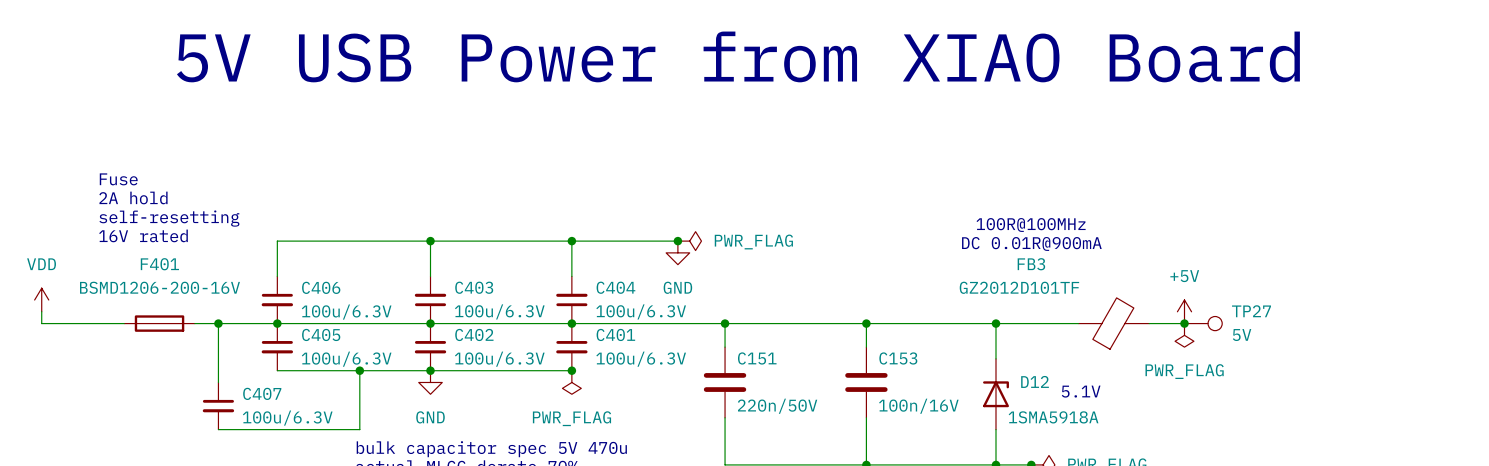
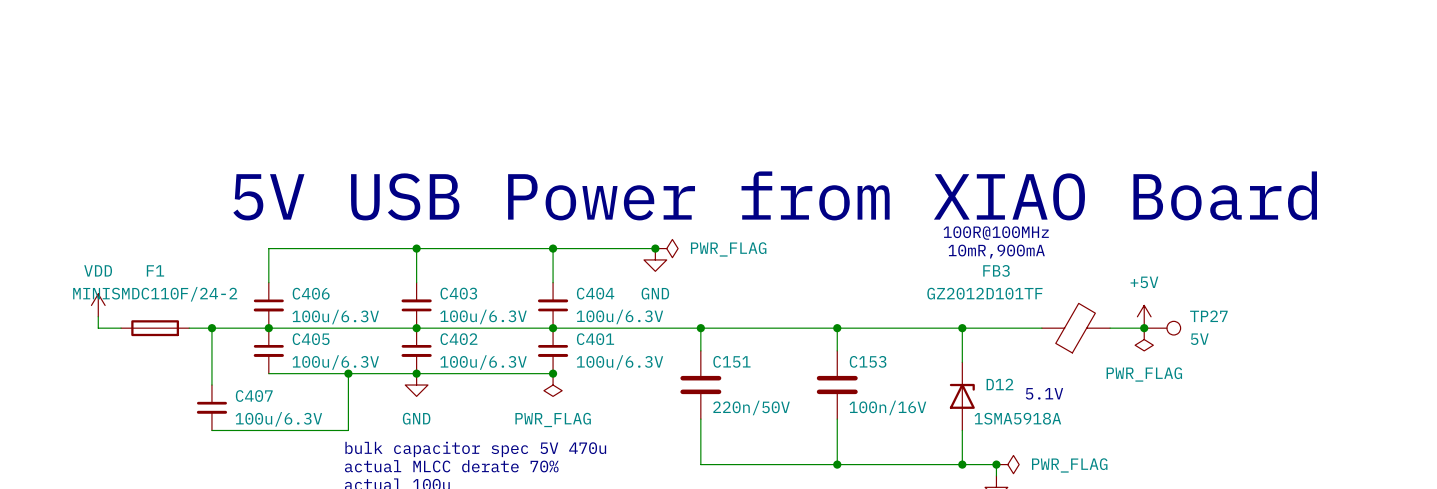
text position: 5V USB Power from XIAO Board (738, 56) -> 5V USB Power from XIAO Board (775, 195)
text: Fuse (118, 179) -> none
text: 2A hold (133, 197) -> none
text: self-resetting (169, 218) -> none
text: 16V rated (143, 235) -> none
text: DC 0.01R@900mA (1031, 243) -> 10mR,900mA (996, 251)
F401 name: F401 (159, 264) -> F1 (155, 270)
F401 value: BSMD1206-200-16V (159, 287) -> MINISMDC110F/24-2 (155, 294)
power symbol position: VDD (41, 300) -> VDD (98, 305)
wire: (41, 311) (41, 323) (100, 323) -> (98, 316) (98, 328)

